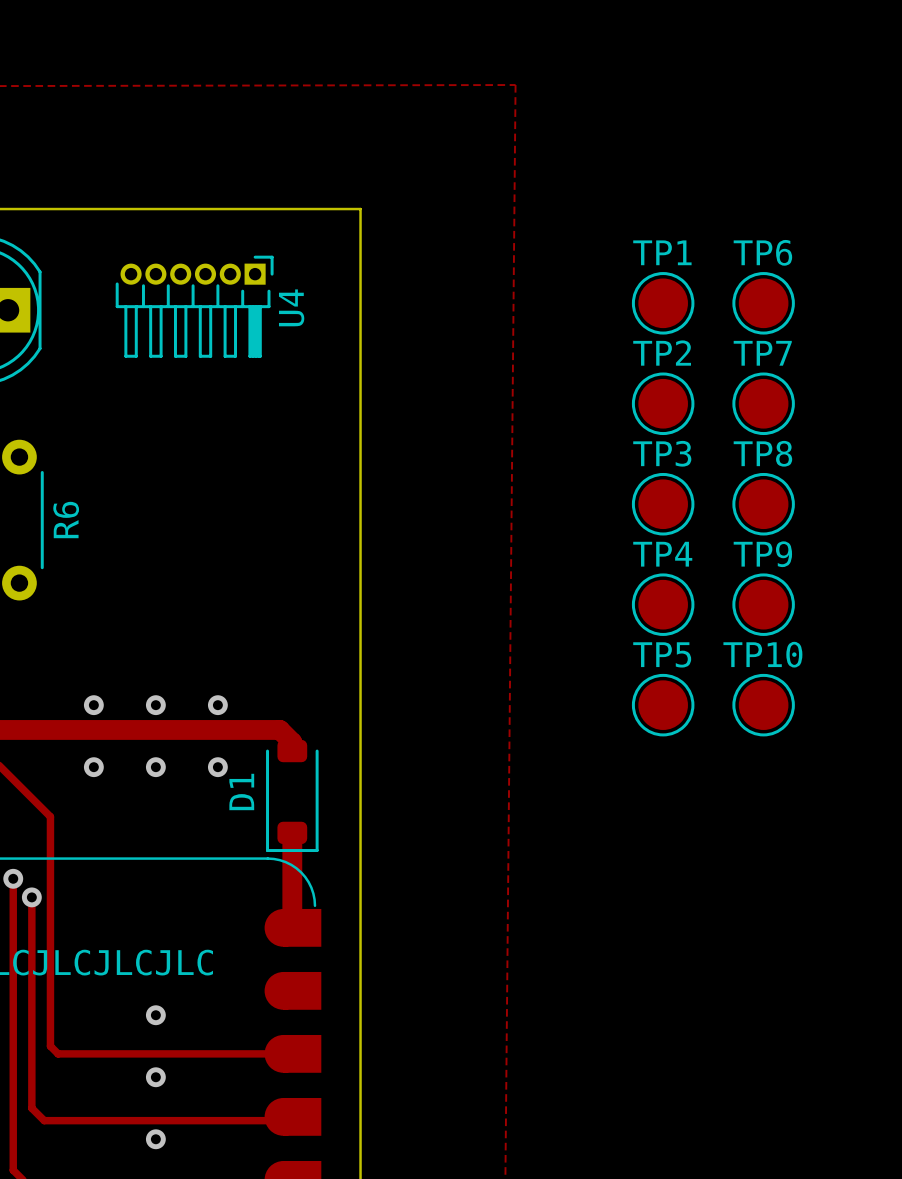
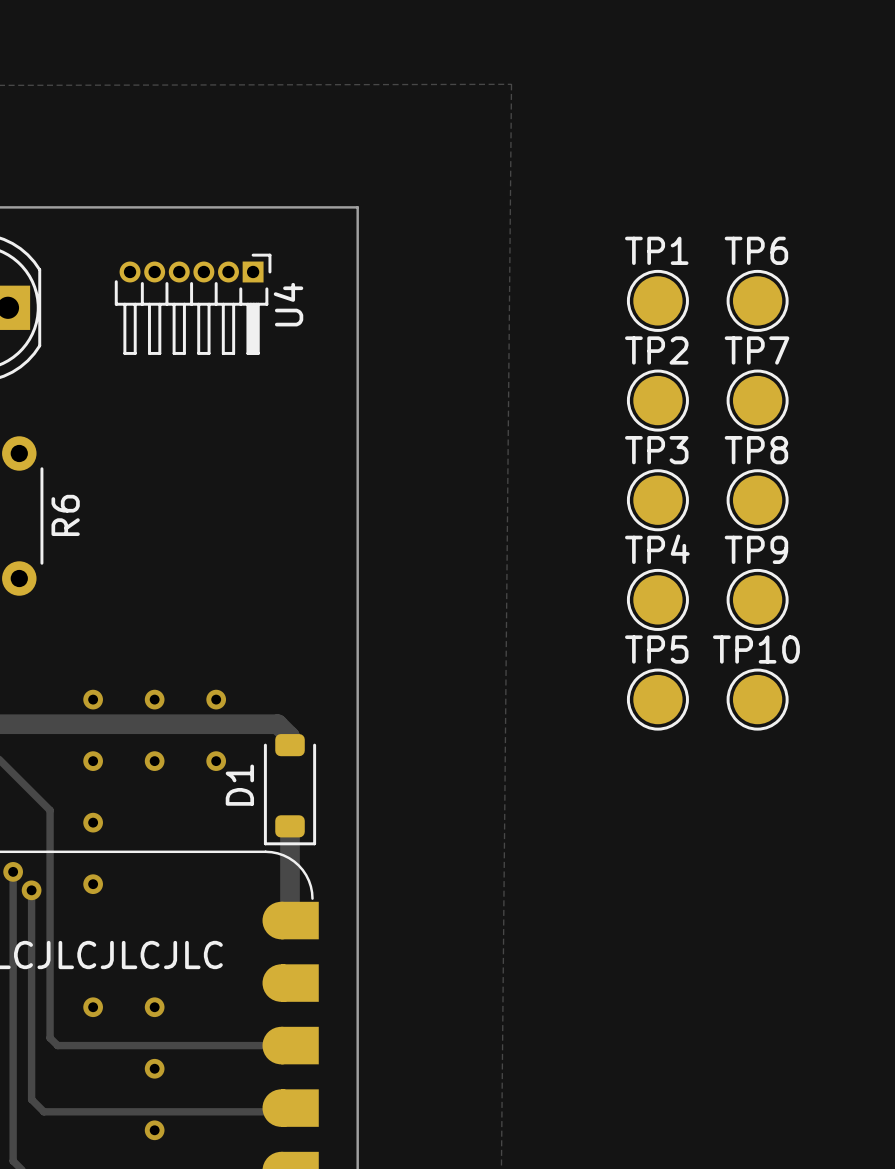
via: none -> (93, 822)
via: none -> (93, 884)
via: none -> (93, 1007)

